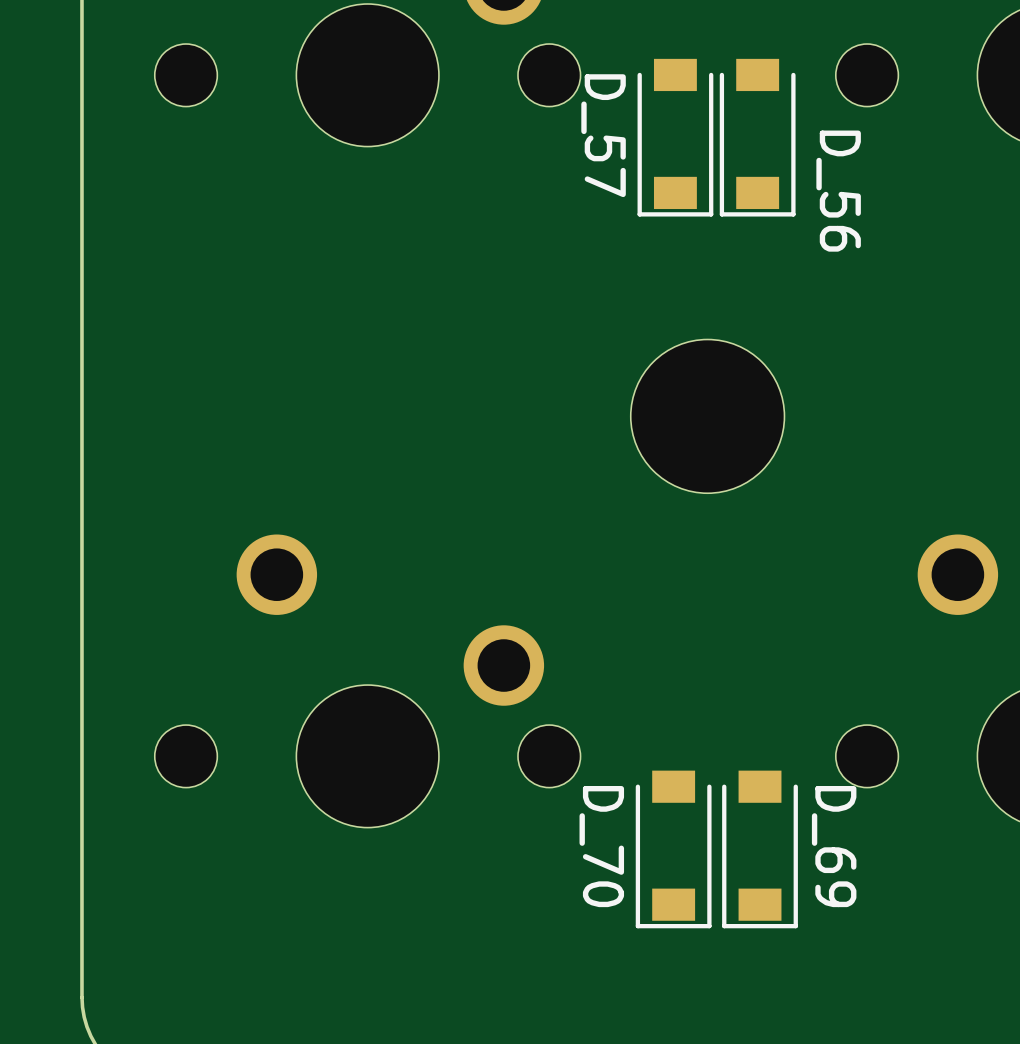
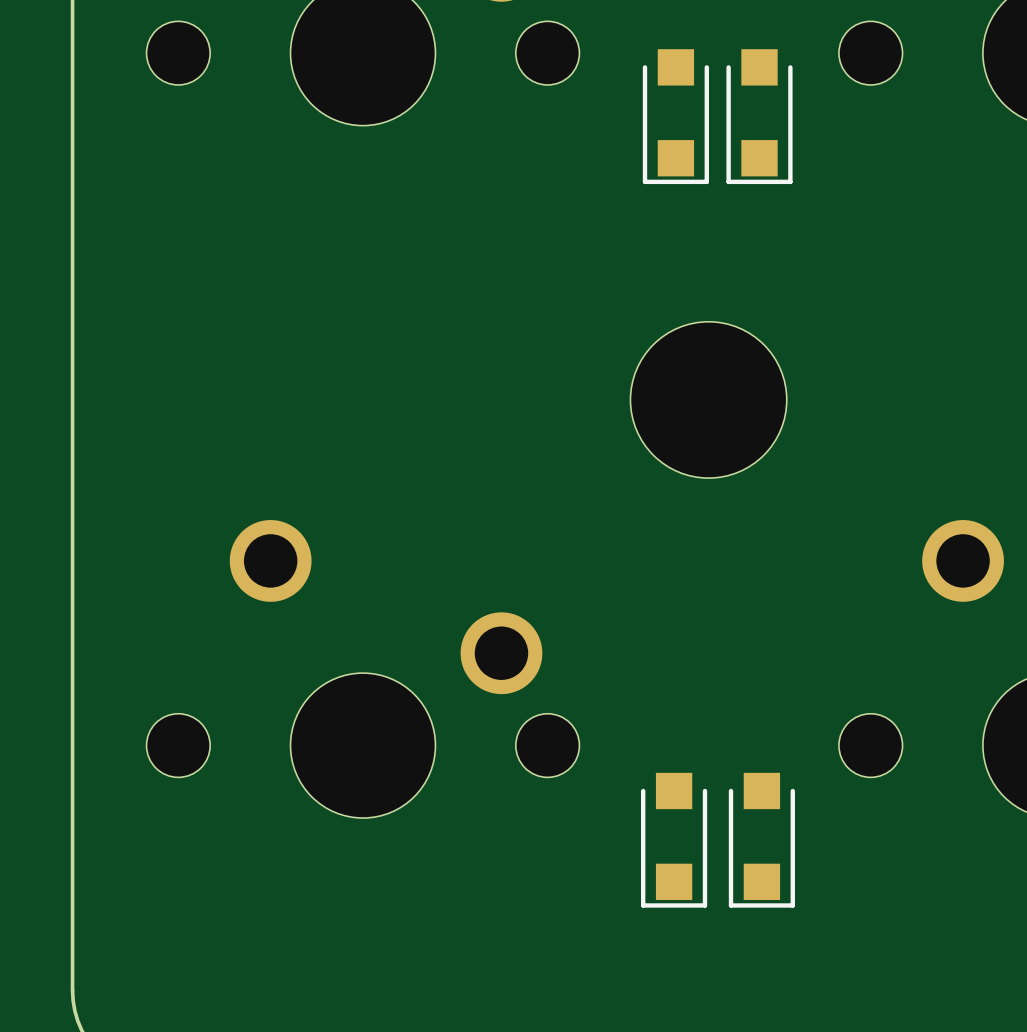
D_57: (675, 137) -> none
part: none -> (675, 116)
D_56: (757, 137) -> none
part: none -> (759, 116)
D_70: (673, 849) -> none
part: none -> (674, 840)
D_69: (760, 849) -> none
part: none -> (761, 840)

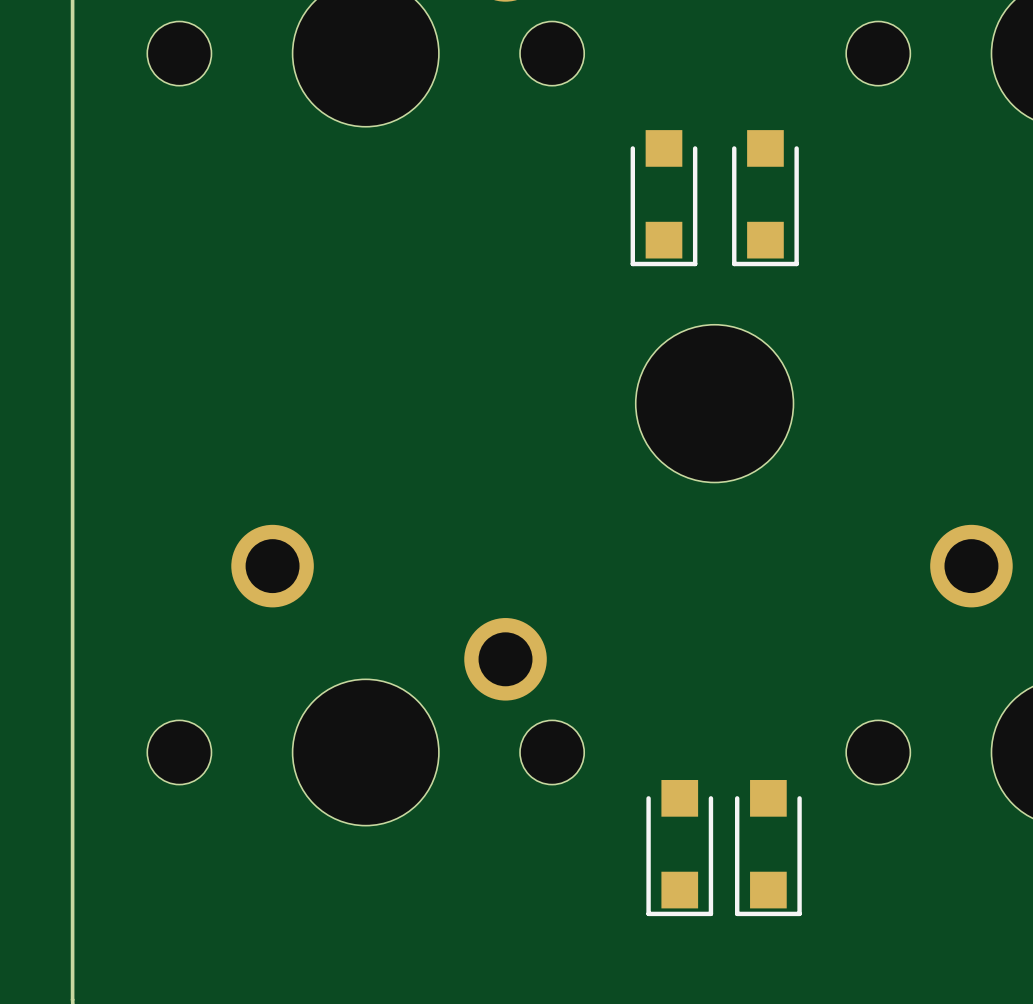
part: (675, 116) -> none
part: (759, 116) -> none
part: none -> (663, 198)
part: none -> (765, 198)

